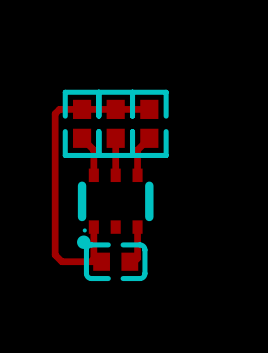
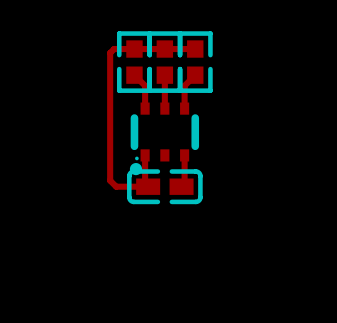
part footprint: [83, 242, 148, 282] -> [127, 169, 203, 205]

